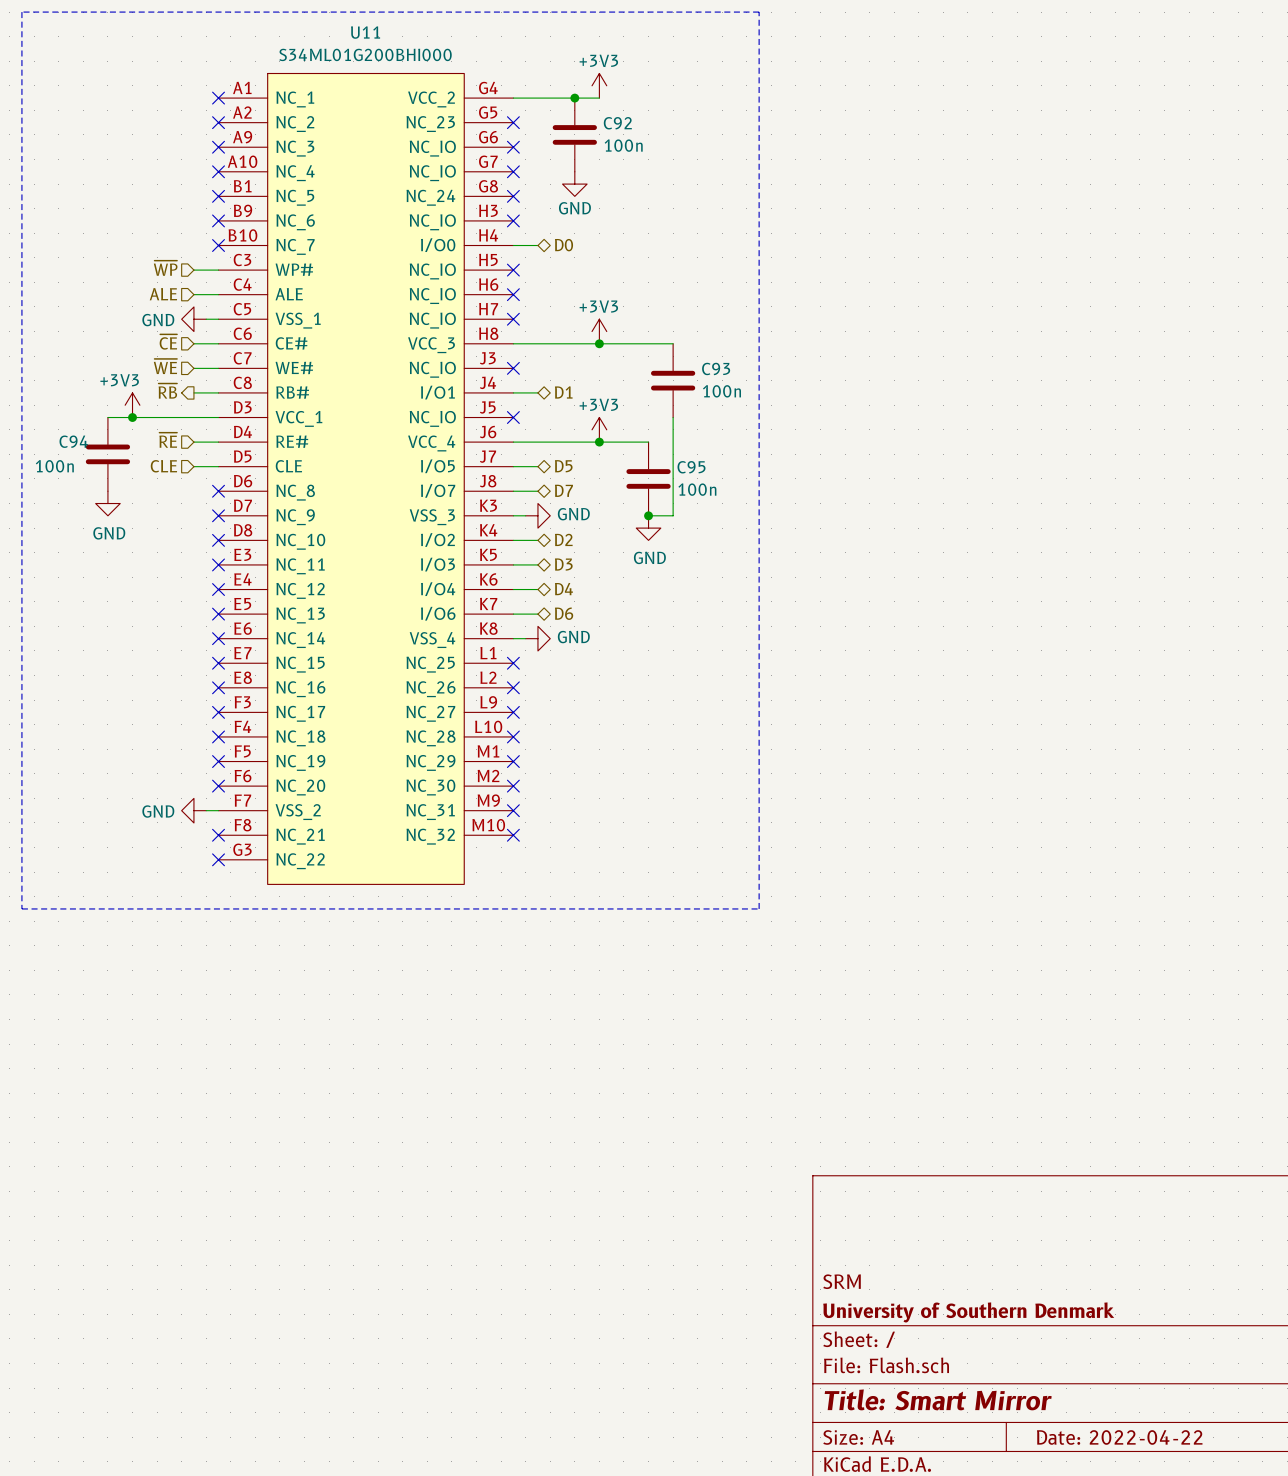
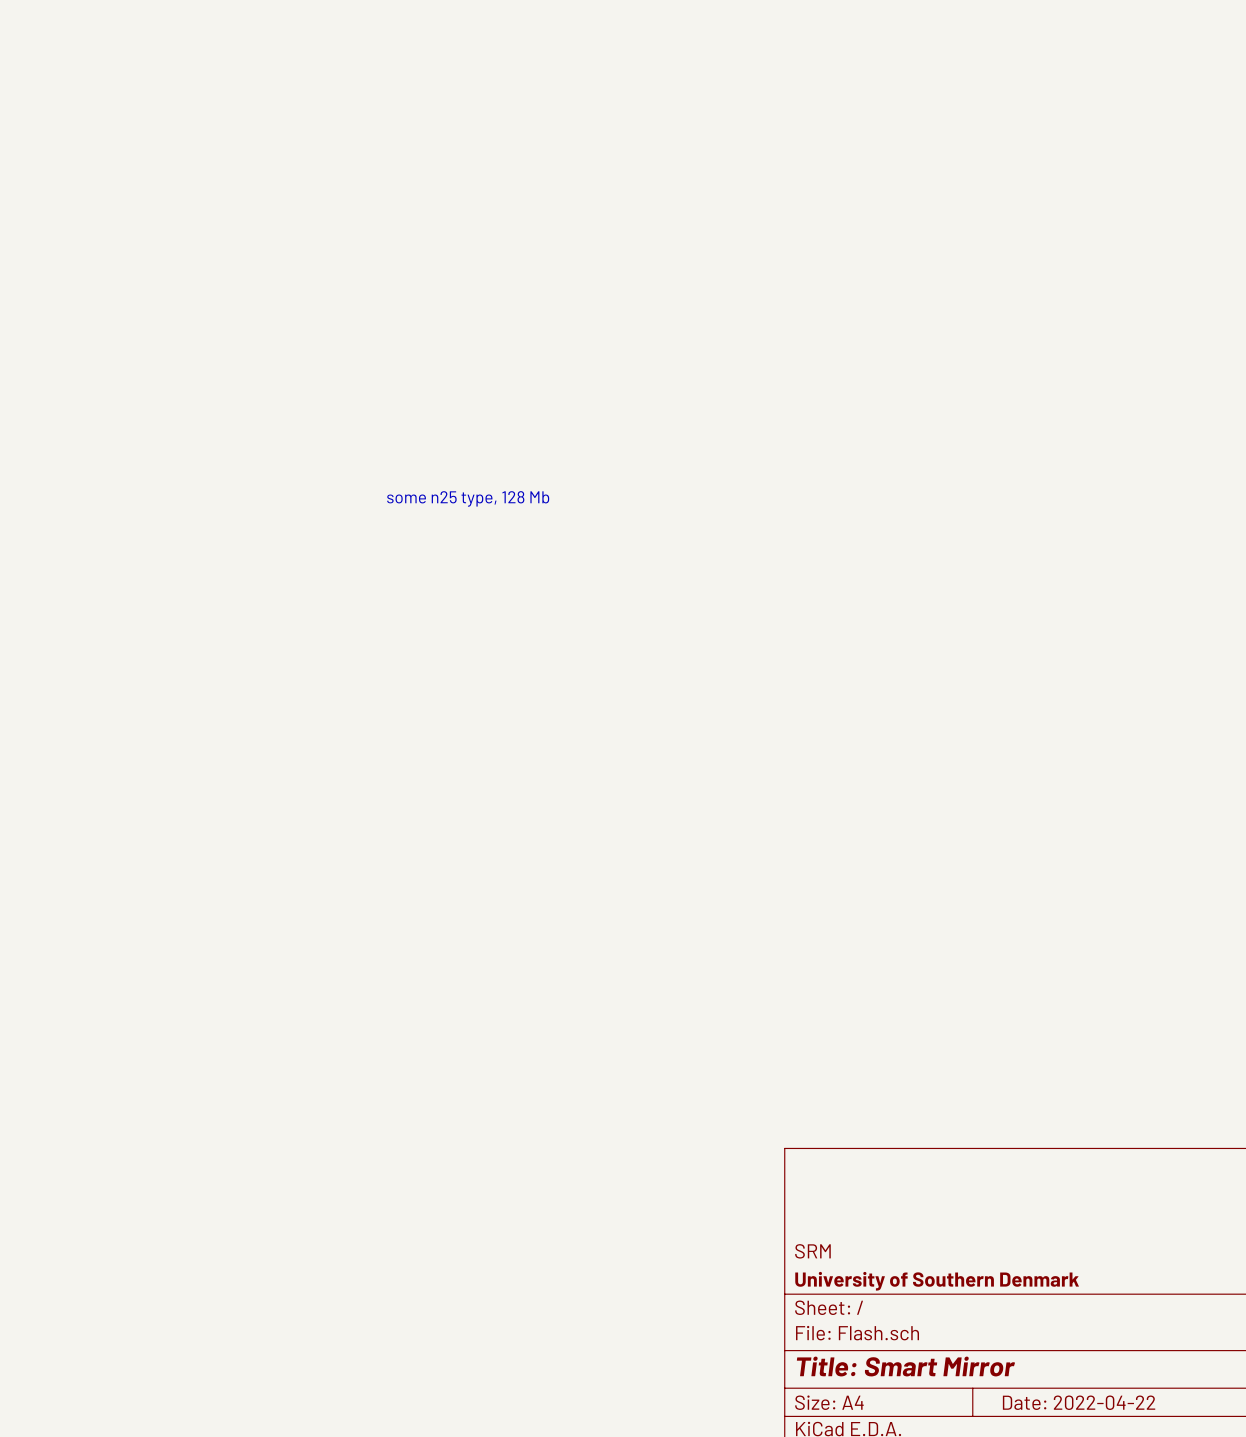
line: (21, 12) (759, 12) (759, 908) (21, 908) (21, 12) -> none
power symbol: +3V3 (599, 85) -> none
no-connect mark: (218, 98) -> none
wire: (513, 98) (599, 98) -> none
junction: (574, 98) -> none
no-connect mark: (218, 122) -> none
no-connect mark: (513, 122) -> none
C92: 100n (574, 134) -> none
no-connect mark: (218, 147) -> none
no-connect mark: (513, 147) -> none
no-connect mark: (218, 171) -> none
no-connect mark: (513, 171) -> none
power symbol: GND (574, 184) -> none
no-connect mark: (218, 196) -> none
no-connect mark: (513, 196) -> none
no-connect mark: (218, 220) -> none
no-connect mark: (513, 220) -> none
no-connect mark: (218, 245) -> none
wire: (513, 245) (537, 245) -> none
hierarchical label: D0 (563, 245) -> none
hierarchical label: ~{WP} (165, 268) -> none
wire: (193, 270) (218, 270) -> none
no-connect mark: (513, 270) -> none
hierarchical label: ALE (163, 294) -> none
wire: (193, 294) (218, 294) -> none
no-connect mark: (513, 294) -> none
power symbol: GND (193, 319) -> none
wire: (206, 319) (218, 319) -> none
no-connect mark: (513, 319) -> none
power symbol: +3V3 (599, 331) -> none
hierarchical label: ~{CE} (168, 342) -> none
wire: (193, 343) (218, 343) -> none
wire: (513, 343) (673, 343) -> none
junction: (599, 343) -> none
hierarchical label: ~{WE} (165, 366) -> none
wire: (193, 368) (218, 368) -> none
no-connect mark: (513, 368) -> none
C93: 100n (673, 380) -> none
hierarchical label: ~{RB} (167, 391) -> none
wire: (193, 392) (218, 392) -> none
wire: (513, 392) (537, 392) -> none
hierarchical label: D1 (563, 392) -> none
power symbol: +3V3 (132, 405) -> none
wire: (107, 417) (218, 417) -> none
junction: (132, 417) -> none
no-connect mark: (513, 417) -> none
wire: (673, 417) (673, 515) (648, 515) -> none
power symbol: +3V3 (599, 429) -> none
hierarchical label: ~{RE} (168, 440) -> none
wire: (193, 442) (218, 442) -> none
wire: (513, 442) (648, 442) -> none
junction: (599, 442) -> none
C94: 100n (107, 454) -> none
hierarchical label: CLE (163, 466) -> none
wire: (193, 466) (218, 466) -> none
wire: (513, 466) (537, 466) -> none
hierarchical label: D5 (563, 466) -> none
U11: S34ML01G200BHI000 (365, 478) -> none
C95: 100n (648, 478) -> none
hierarchical label: D7 (563, 490) -> none
no-connect mark: (218, 491) -> none
wire: (513, 491) (537, 491) -> none
power symbol: GND (107, 503) -> none
text: none -> some n25 type, 128 Mb (468, 498)
no-connect mark: (218, 515) -> none
wire: (513, 515) (525, 515) -> none
power symbol: GND (537, 515) -> none
junction: (648, 515) -> none
power symbol: GND (648, 528) -> none
hierarchical label: D2 (563, 539) -> none
no-connect mark: (218, 540) -> none
wire: (513, 540) (537, 540) -> none
no-connect mark: (218, 564) -> none
wire: (513, 564) (537, 564) -> none
hierarchical label: D3 (563, 564) -> none
no-connect mark: (218, 589) -> none
wire: (513, 589) (537, 589) -> none
hierarchical label: D4 (563, 589) -> none
hierarchical label: D6 (564, 613) -> none
no-connect mark: (218, 614) -> none
wire: (513, 614) (537, 614) -> none
no-connect mark: (218, 638) -> none
wire: (513, 638) (525, 638) -> none
power symbol: GND (537, 638) -> none
no-connect mark: (218, 663) -> none
no-connect mark: (513, 663) -> none
no-connect mark: (218, 687) -> none
no-connect mark: (513, 687) -> none
no-connect mark: (218, 712) -> none
no-connect mark: (513, 712) -> none
no-connect mark: (218, 736) -> none
no-connect mark: (513, 736) -> none
no-connect mark: (218, 761) -> none
no-connect mark: (513, 761) -> none
no-connect mark: (218, 786) -> none
no-connect mark: (513, 786) -> none
power symbol: GND (193, 810) -> none
wire: (206, 810) (218, 810) -> none
no-connect mark: (513, 810) -> none
no-connect mark: (218, 835) -> none
no-connect mark: (513, 835) -> none
no-connect mark: (218, 859) -> none

